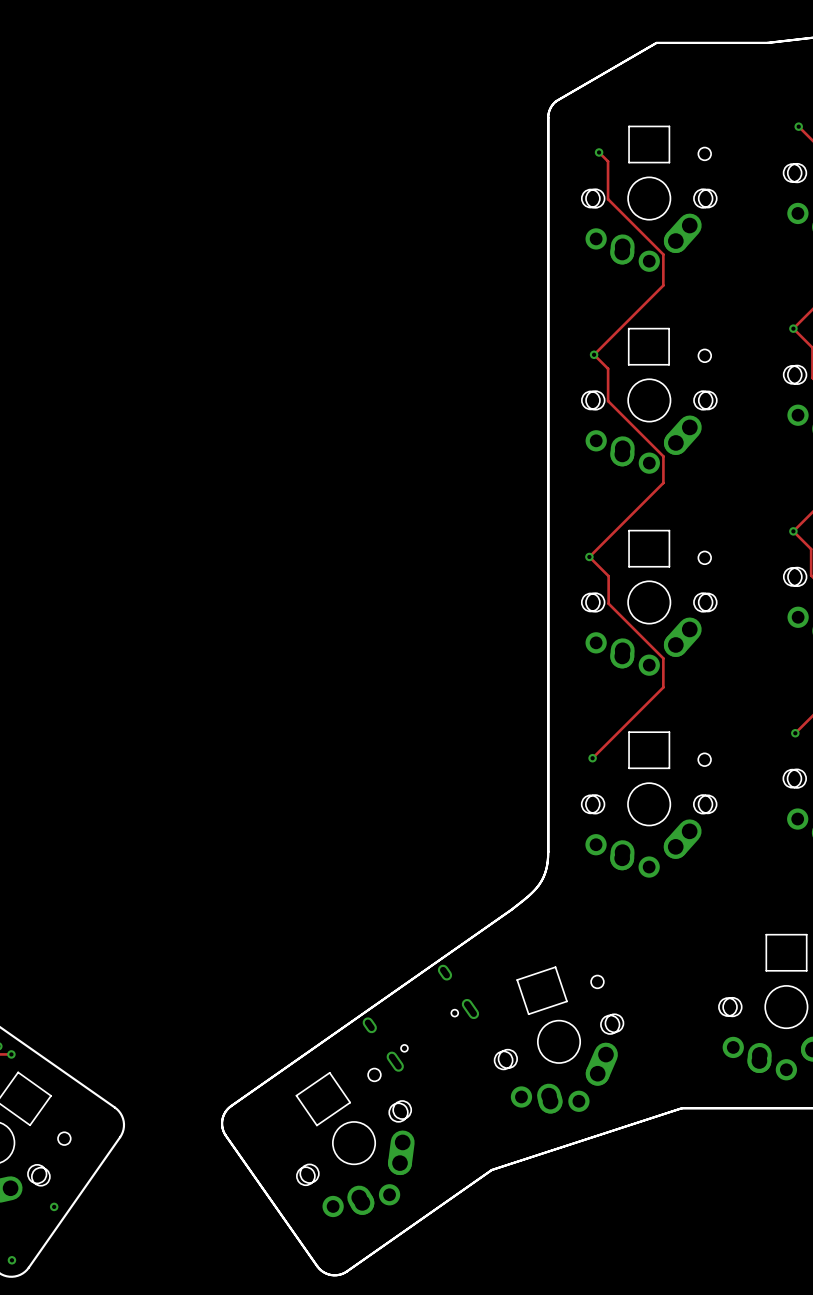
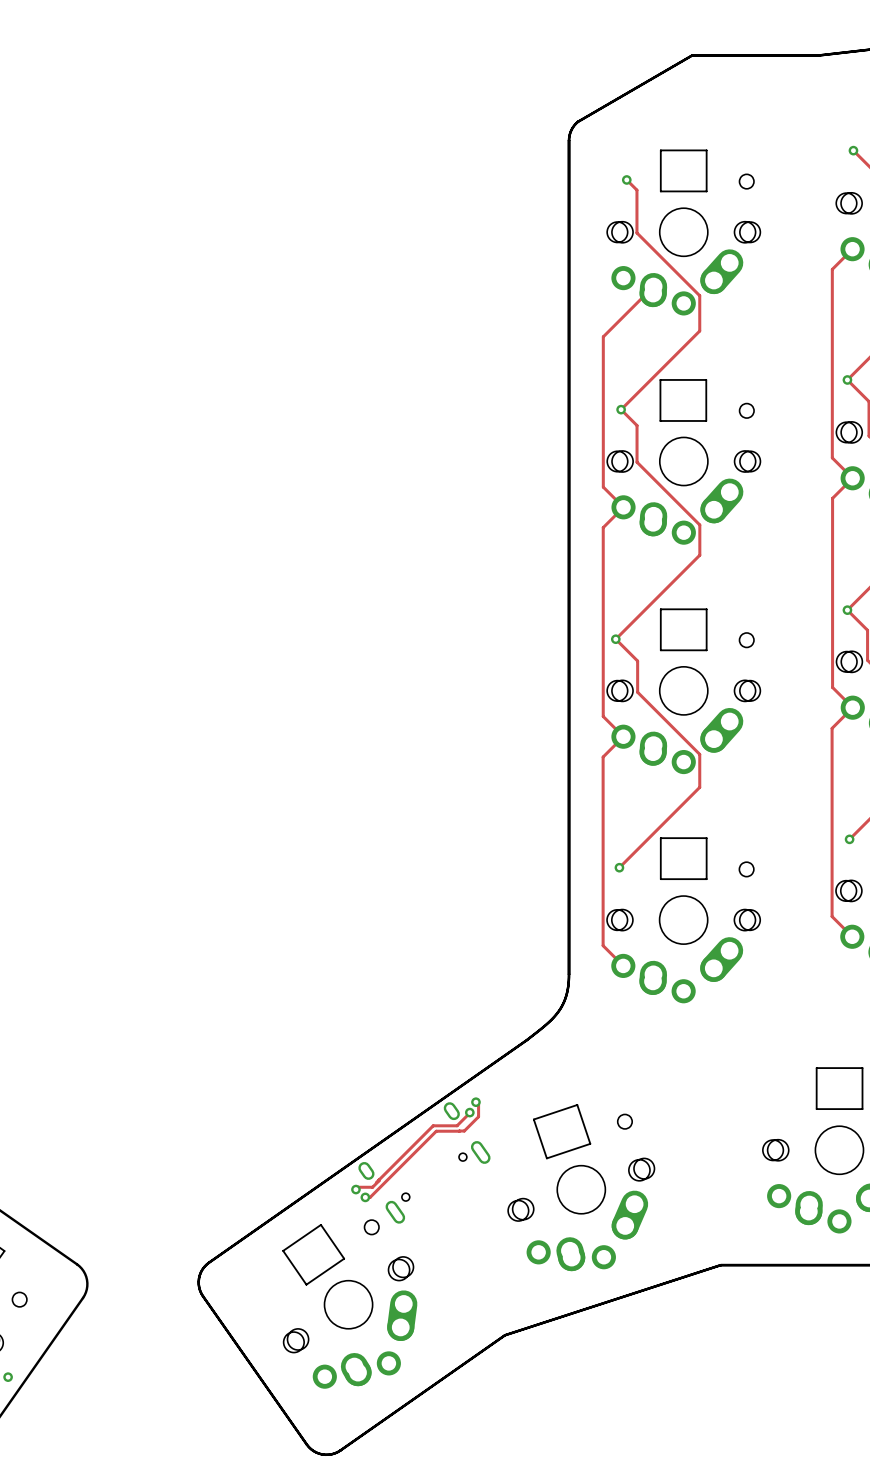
track: none -> (852, 249) (832, 269) (832, 457) (852, 478) (832, 498) (832, 687) (852, 707) (832, 728) (832, 916) (852, 936)
track: none -> (653, 286) (603, 336) (603, 487) (623, 507) (603, 527) (603, 716) (623, 736) (603, 757) (603, 945) (623, 965)
track: none -> (475, 1102) (478, 1104) (478, 1116) (464, 1131) (436, 1131) (370, 1197) (365, 1197)
via: none -> (475, 1102)
track: none -> (469, 1112) (457, 1125) (433, 1125) (376, 1182)
via: none -> (469, 1112)
track: none -> (379, 1179) (372, 1187) (358, 1187) (355, 1189)
via: none -> (355, 1189)
via: none -> (365, 1197)

